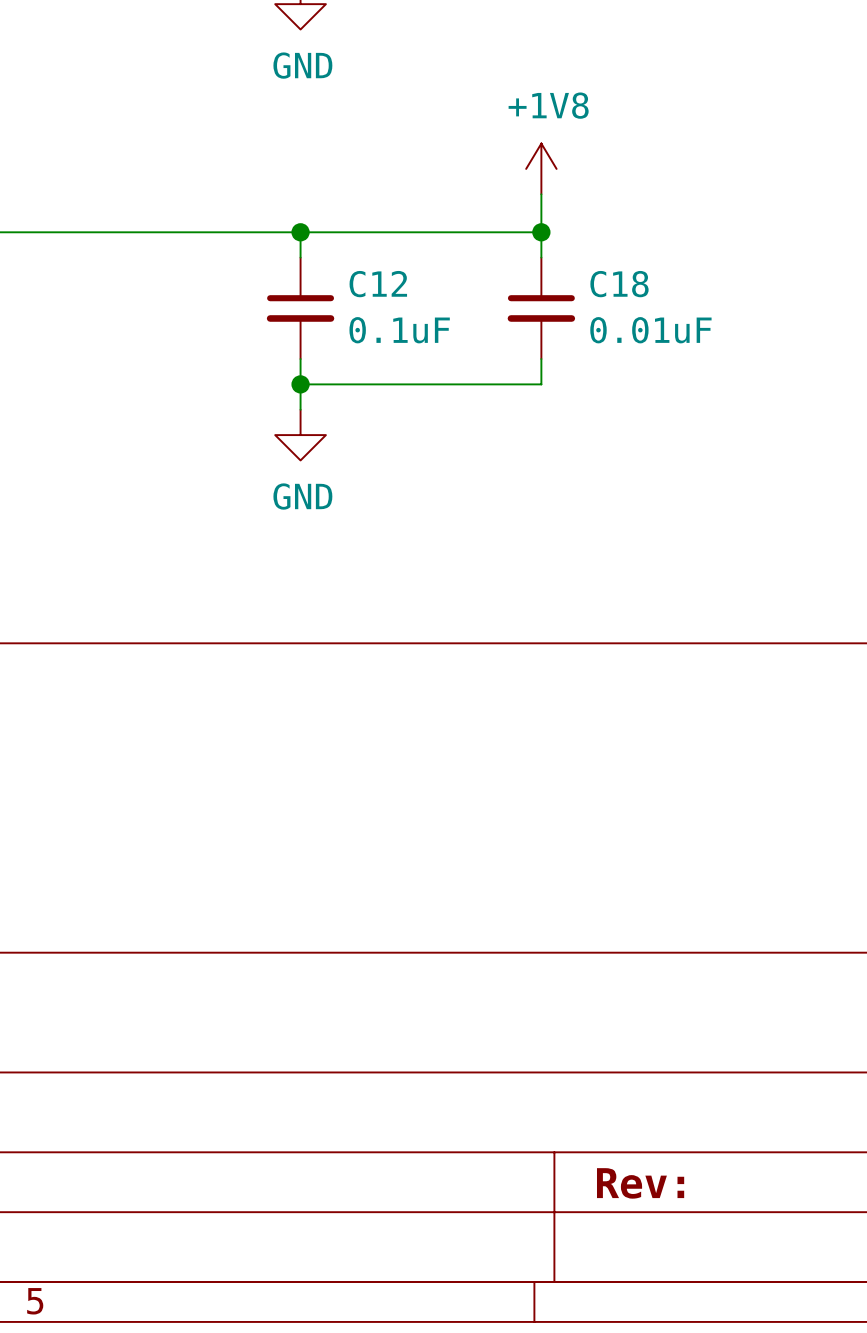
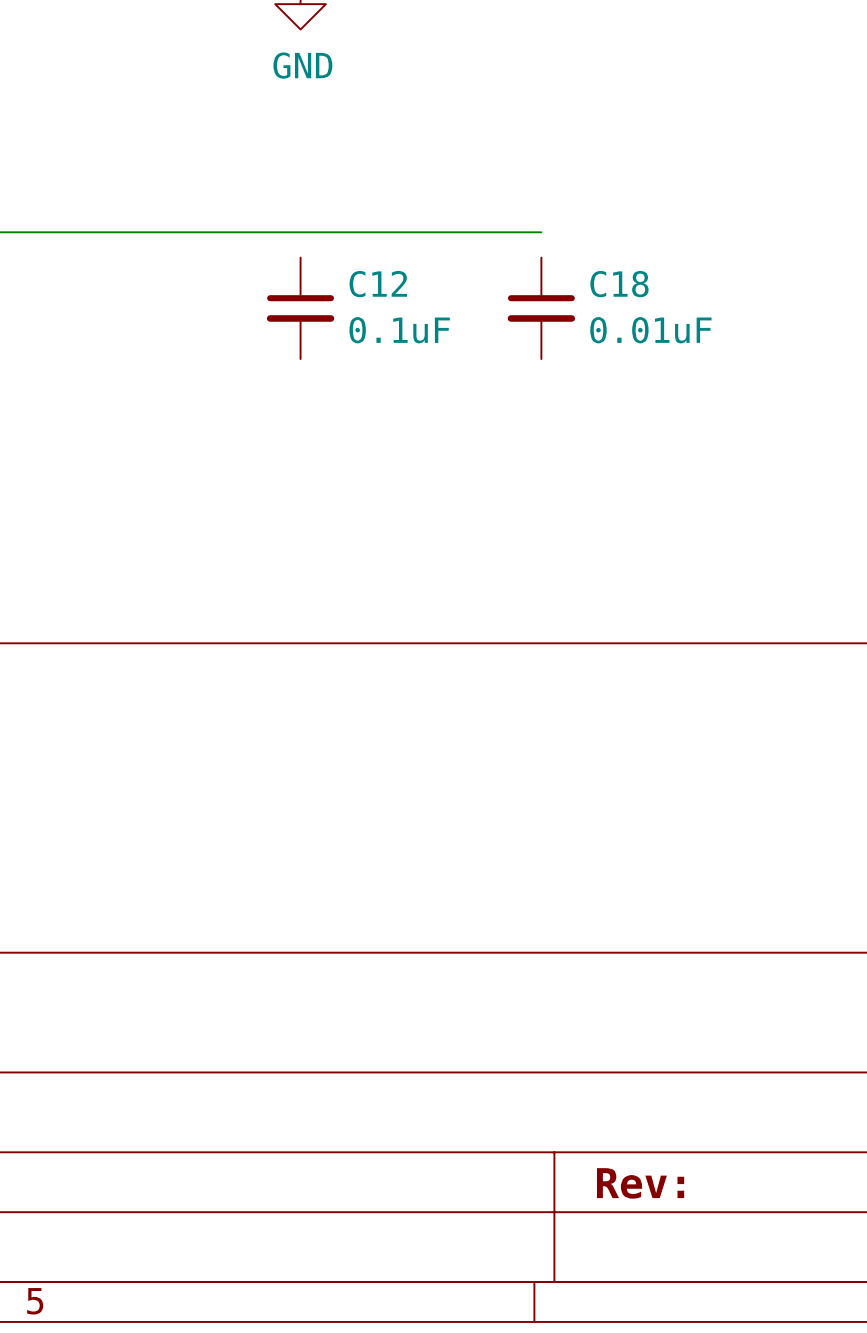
power symbol: +1V8 (541, 168) -> none
wire: (541, 194) (541, 257) -> none
wire: (300, 232) (300, 257) -> none
junction: (300, 232) -> none
junction: (541, 232) -> none
wire: (300, 359) (300, 409) -> none
wire: (541, 359) (541, 384) (300, 384) -> none
junction: (300, 384) -> none
power symbol: GND (300, 435) -> none

